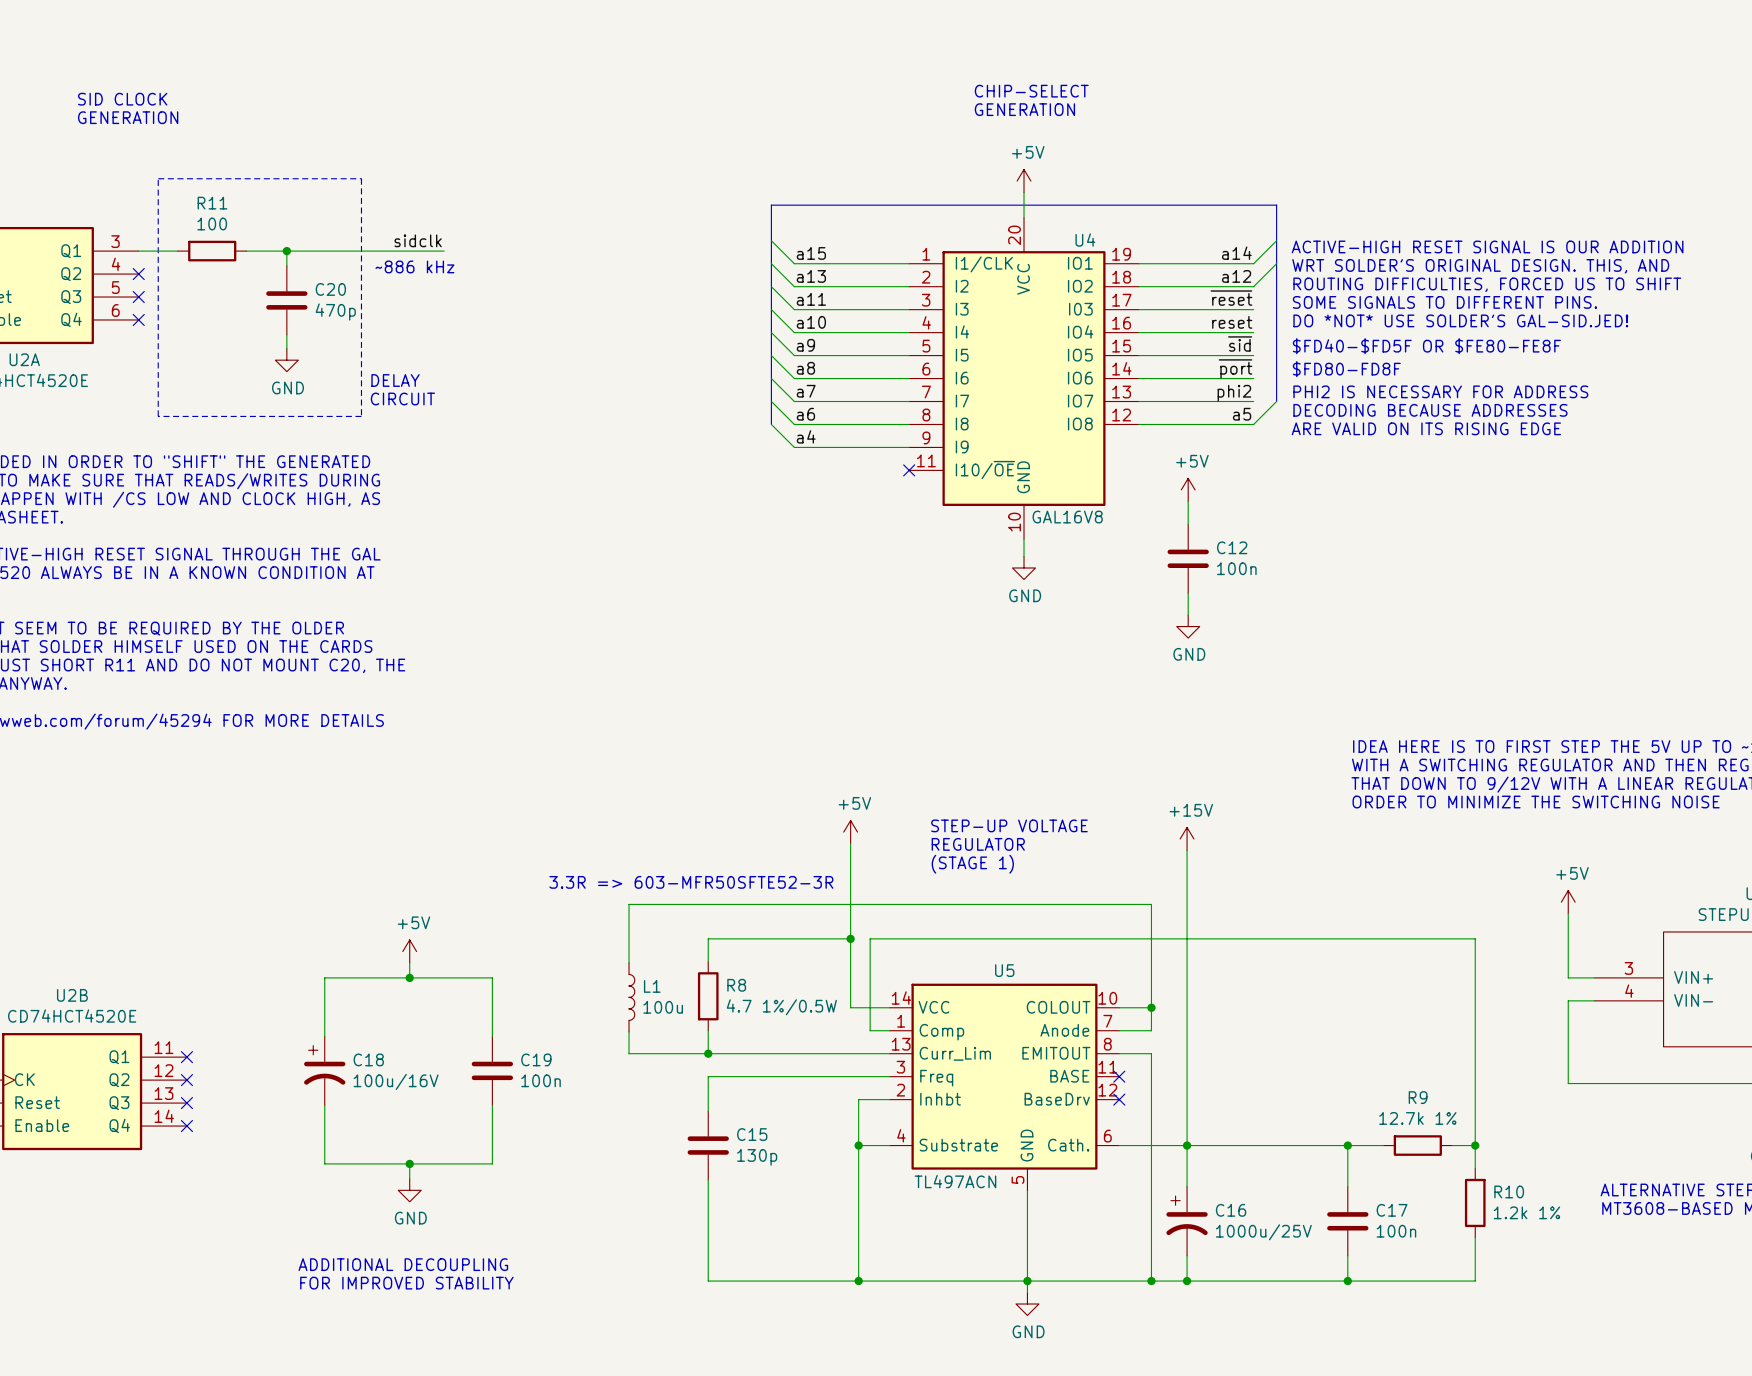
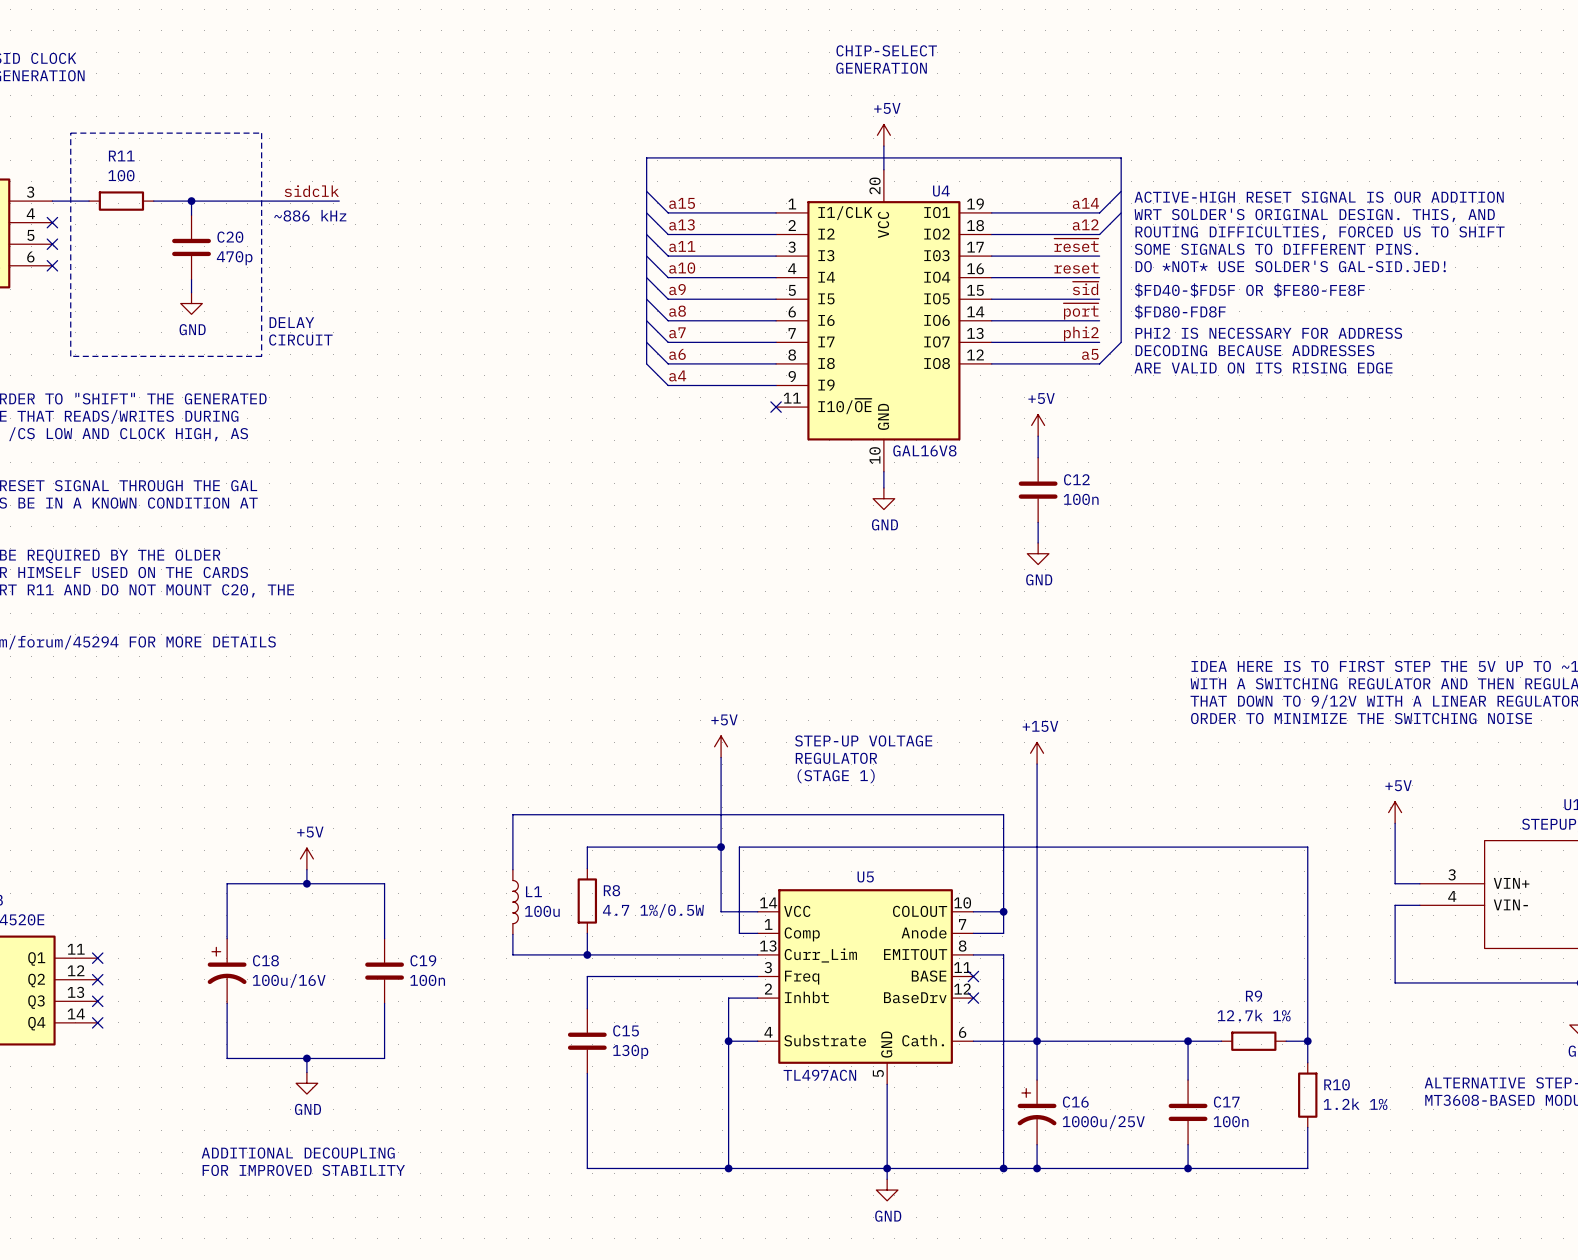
text: 3.3R => 603-MFR50SFTE52-3R (691, 882) -> none

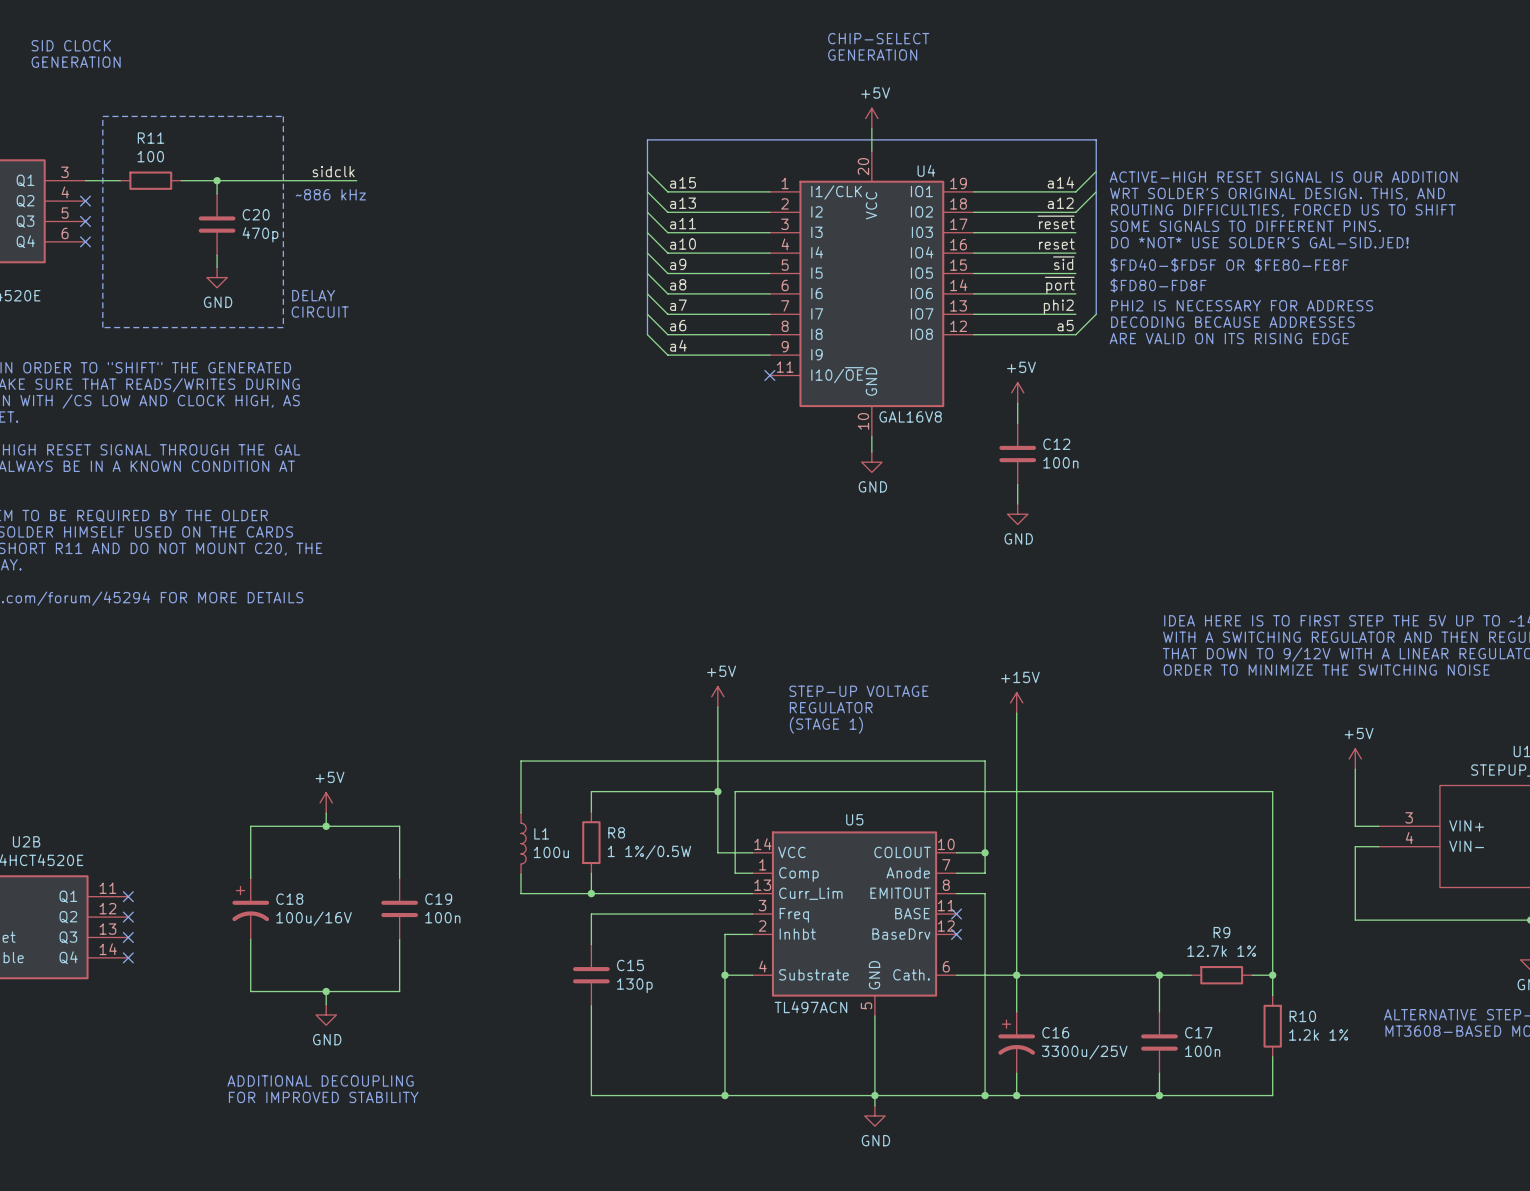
R8 value: 4.7 1%/0.5W (653, 910) -> 1 1%/0.5W (649, 852)
C16 value: 1000u/25V (1103, 1122) -> 3300u/25V (1084, 1052)

